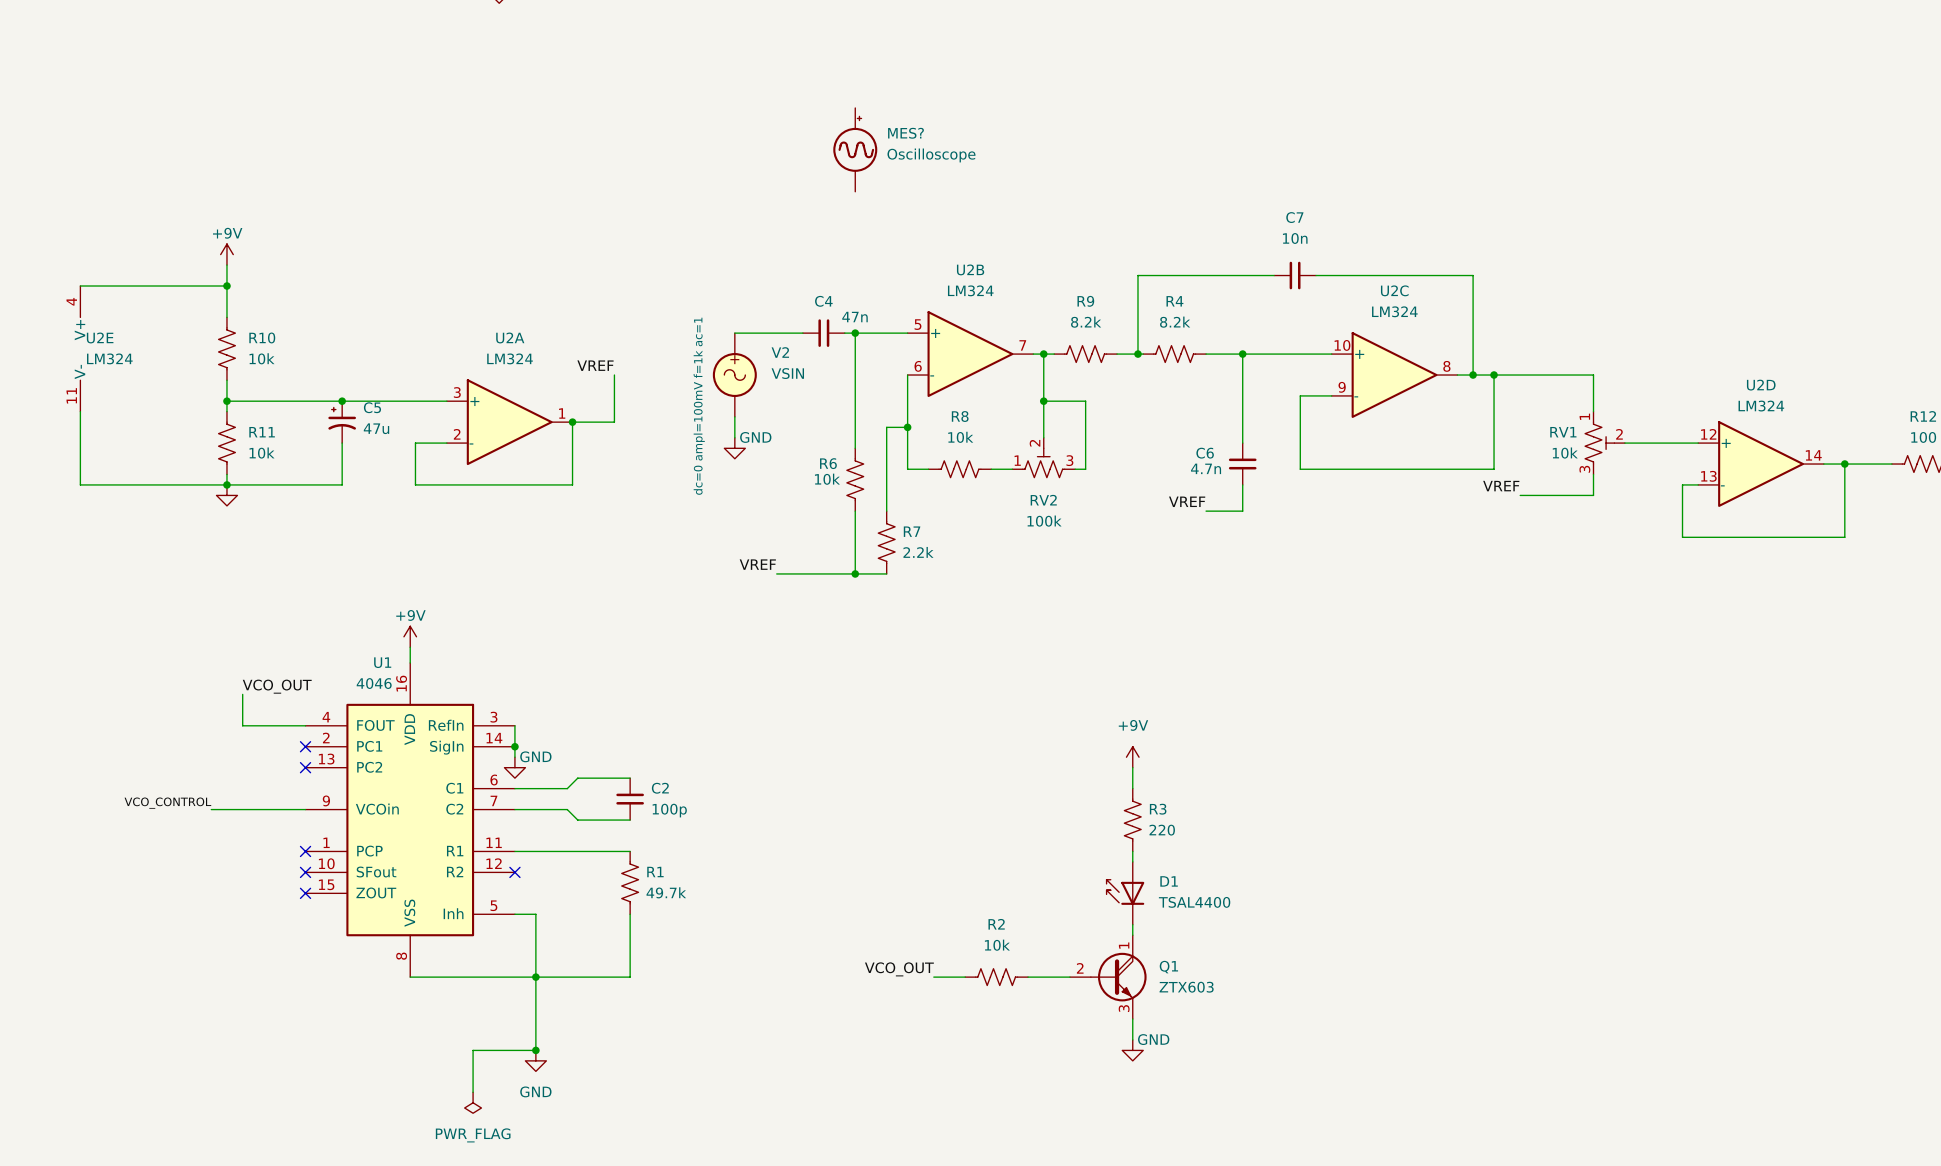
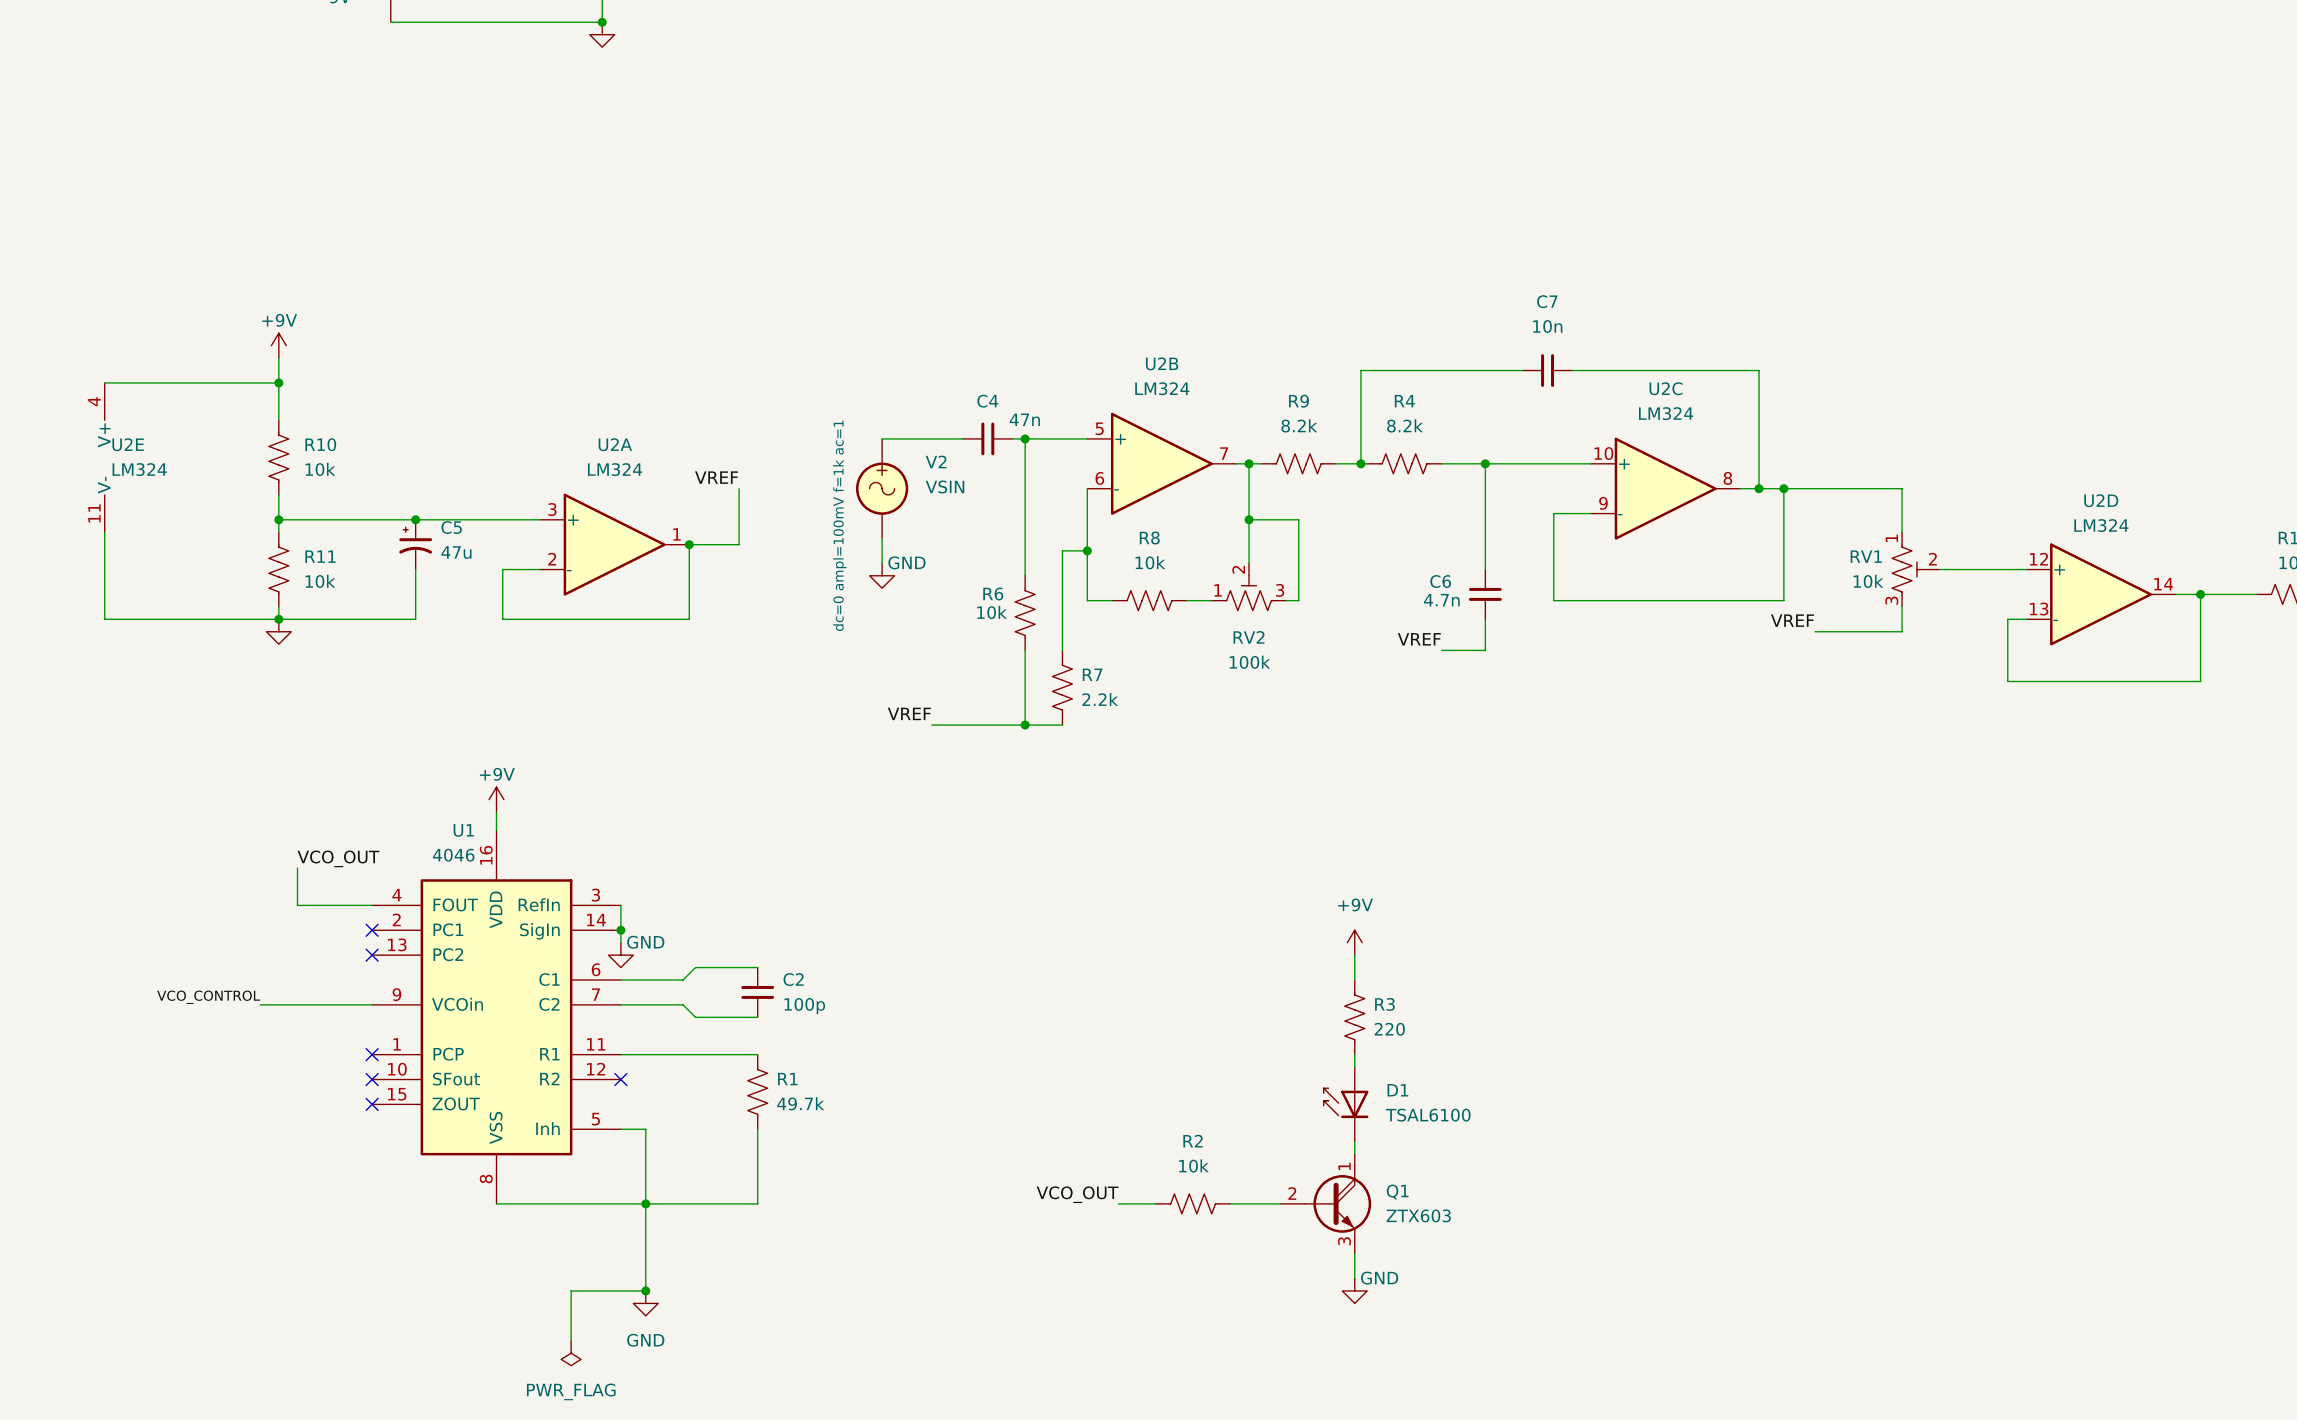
MES?: Oscilloscope (855, 149) -> none
D1 value: TSAL4400 (1194, 902) -> TSAL6100 (1428, 1115)

